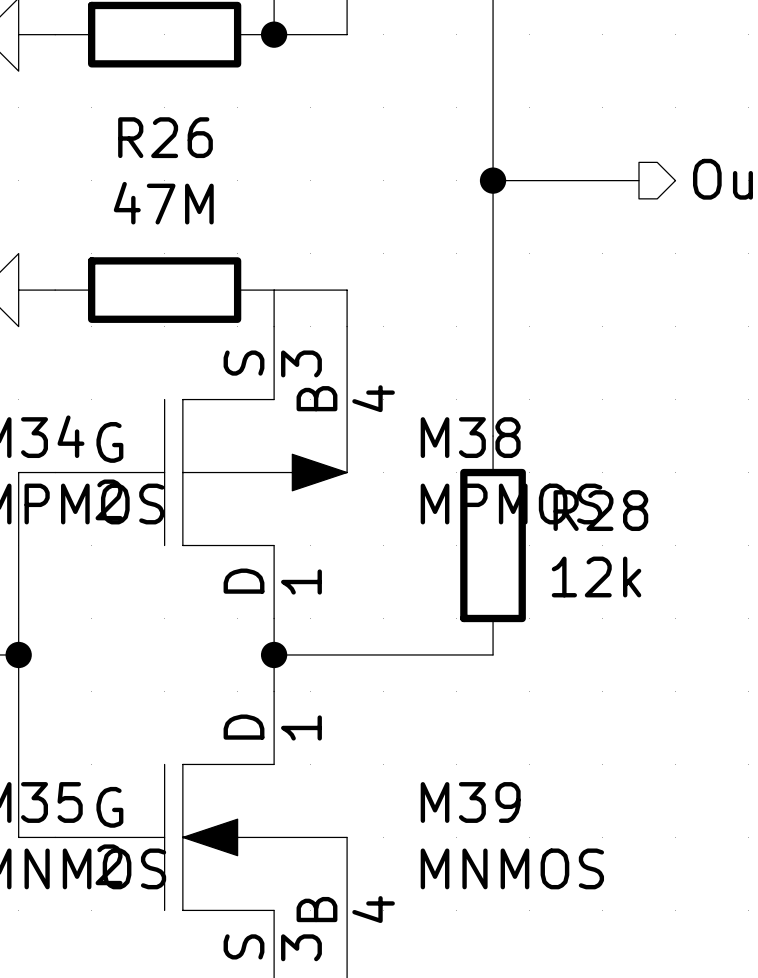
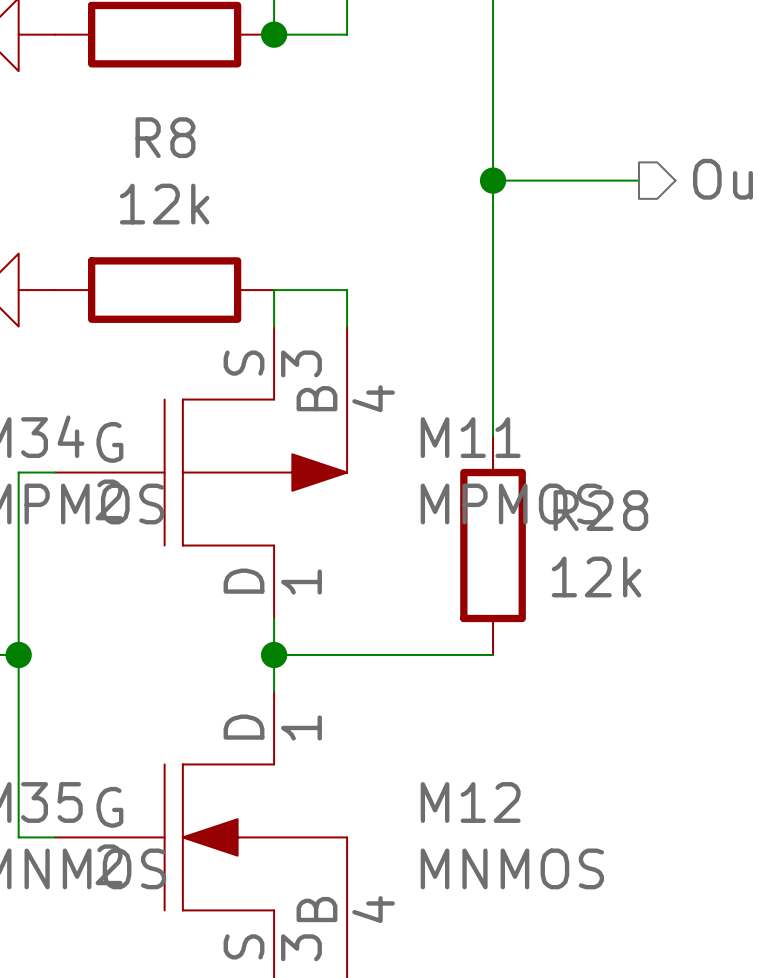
R26 name: R26 (165, 137) -> R8 (165, 137)
R26 value: 47M (163, 203) -> 12k (164, 204)
M38 name: M38 (470, 437) -> M11 (470, 437)
M39 name: M39 (470, 802) -> M12 (470, 802)

